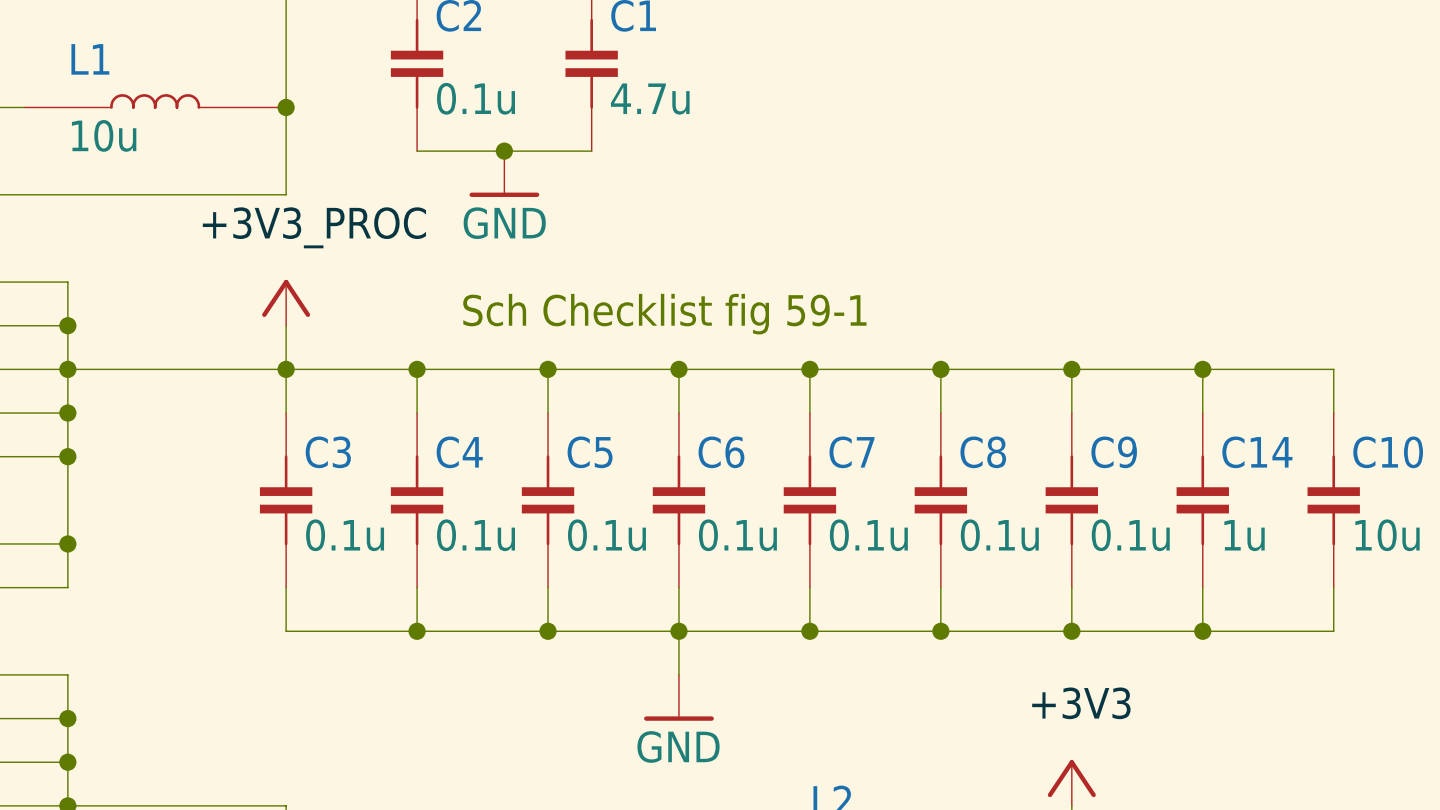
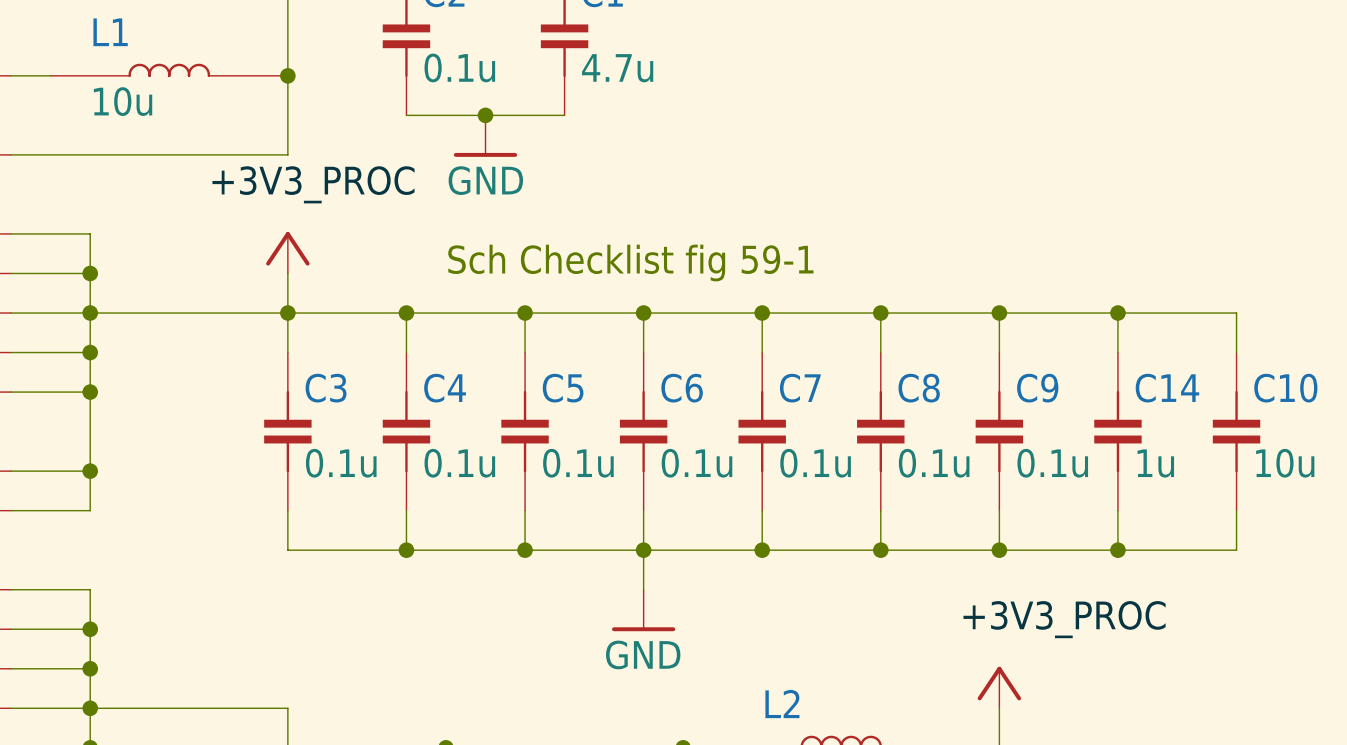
label: +3V3 (1081, 703) -> +3V3_PROC (1064, 619)

